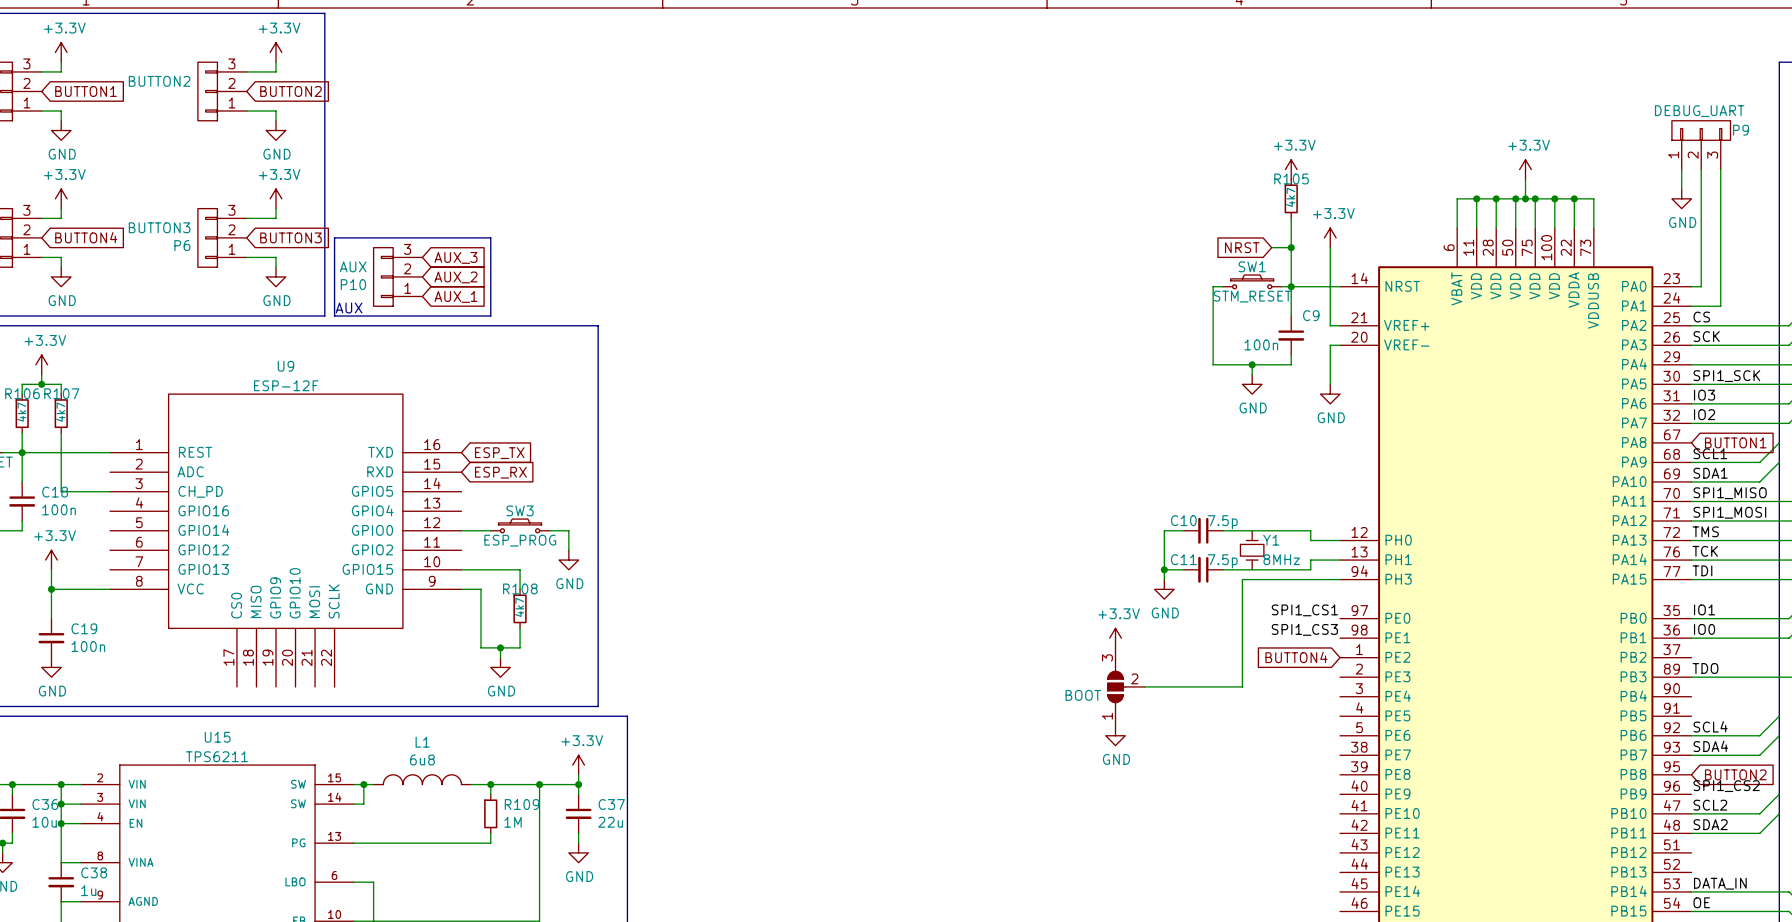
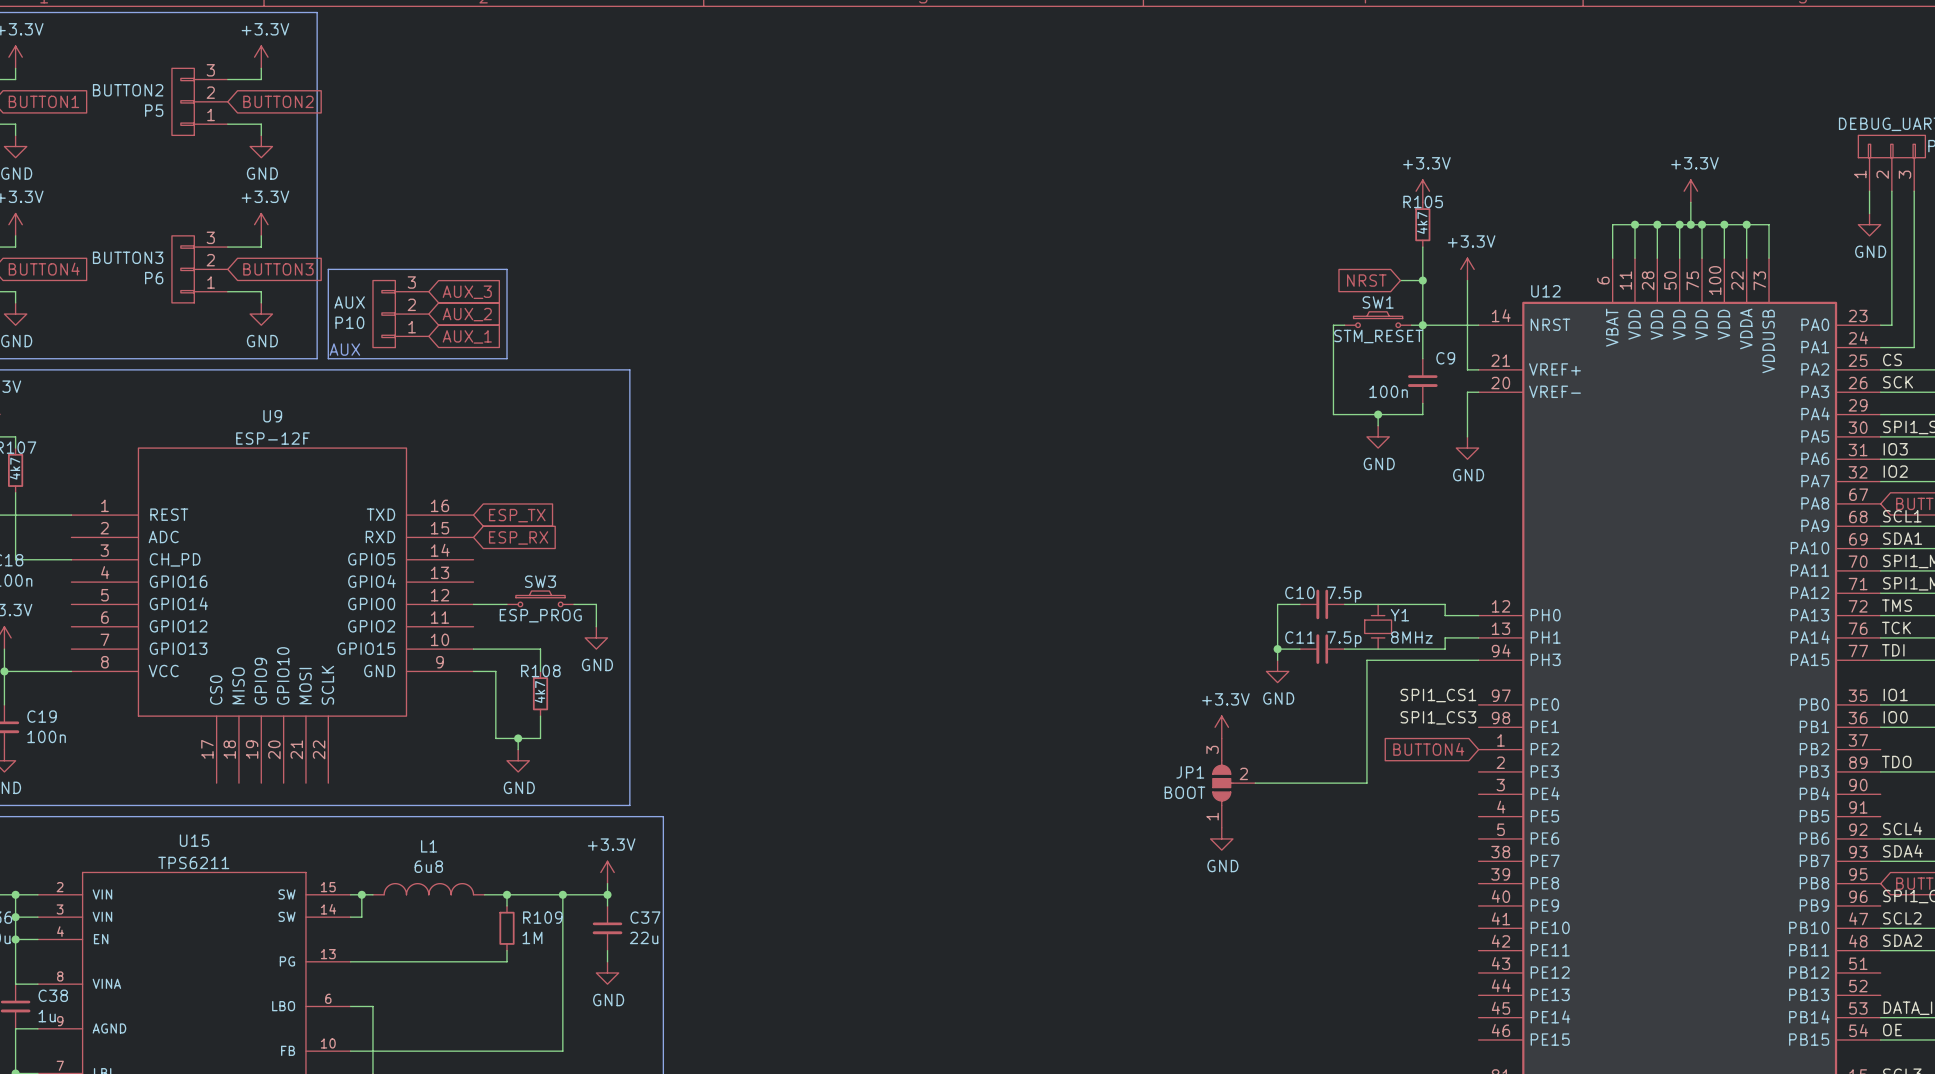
P5 name: none -> P5 (154, 110)
U12 name: none -> U12 (1545, 291)
JP1: none -> BOOT (1234, 783)

